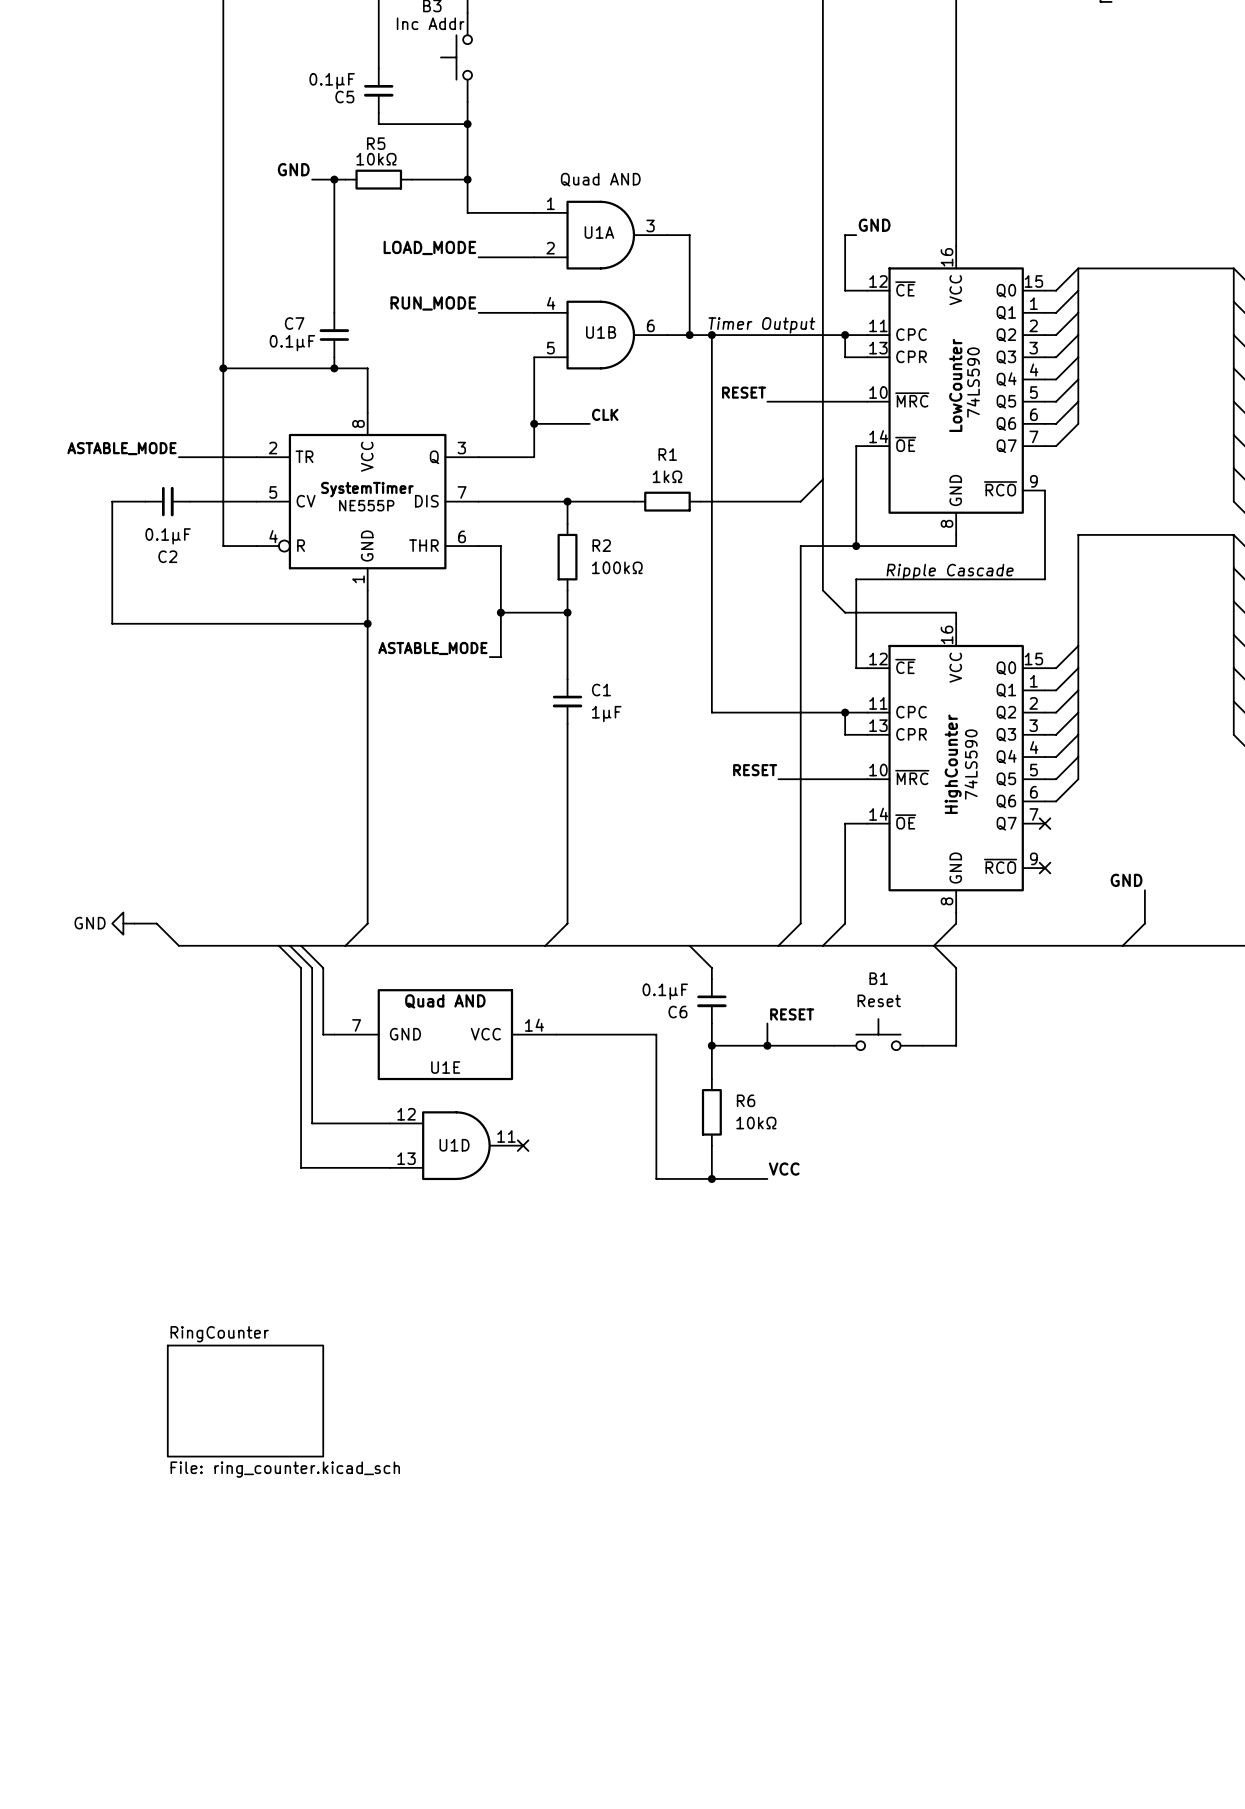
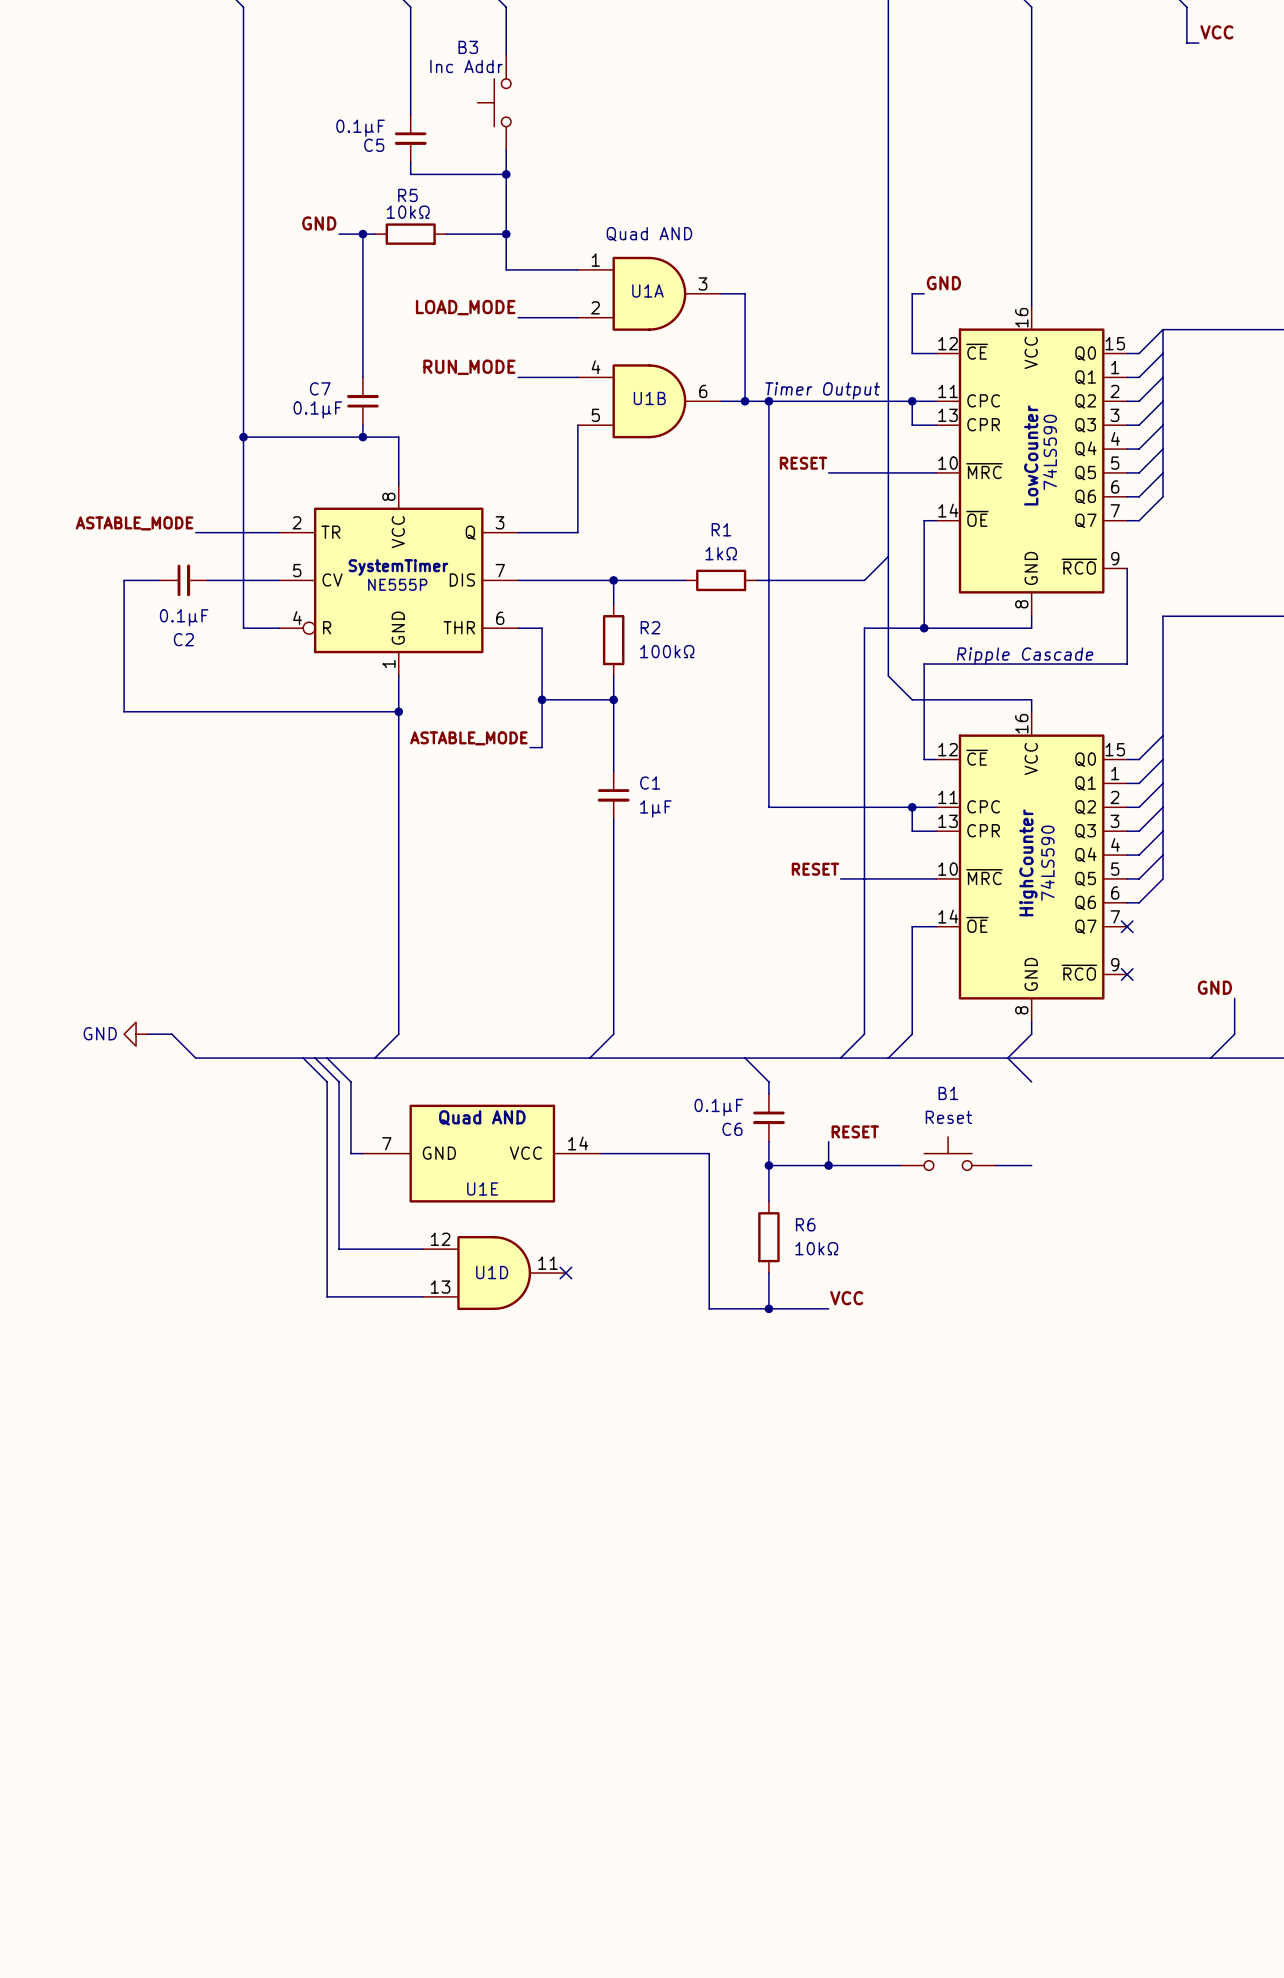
label: CLK (605, 414) -> none
wire: (534, 423) (589, 423) -> none
junction: (534, 423) -> none
wire: (956, 967) (956, 1045) -> none
sheet RingCounter: File: ring_counter.kicad_sch (245, 1401) -> none

